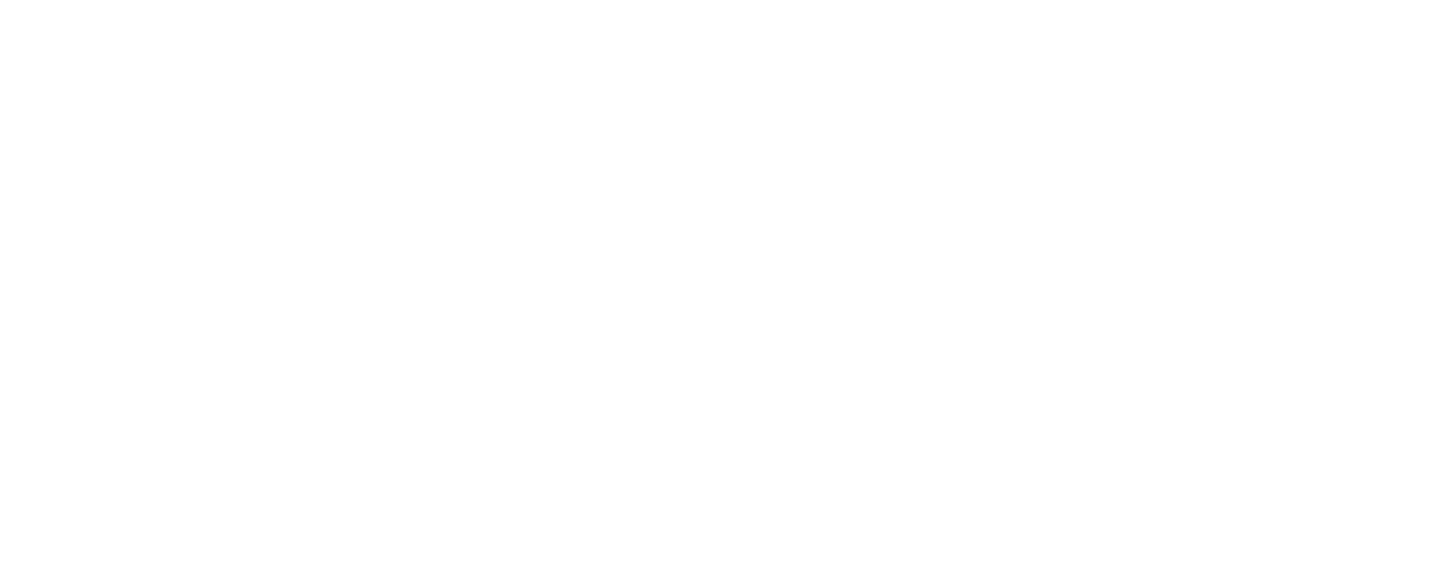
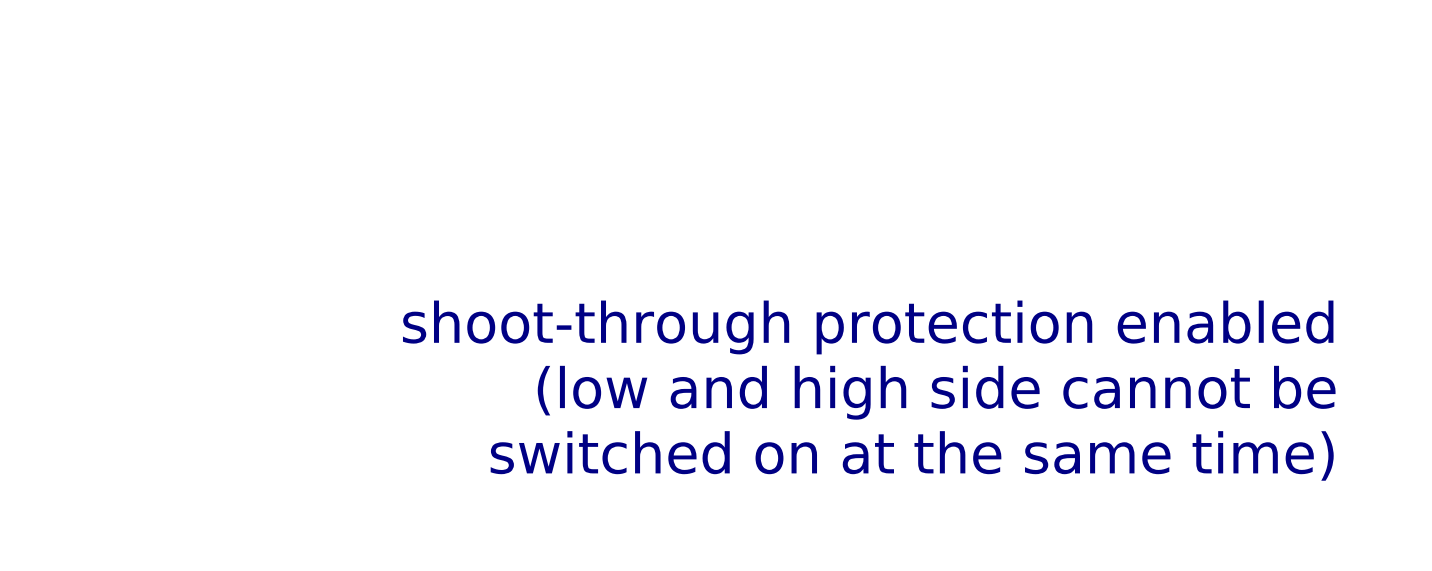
text: none -> shoot-through protection enabled (868, 327)
text: none -> (low and high side cannot be (936, 392)
text: none -> switched on at the same time) (912, 455)

